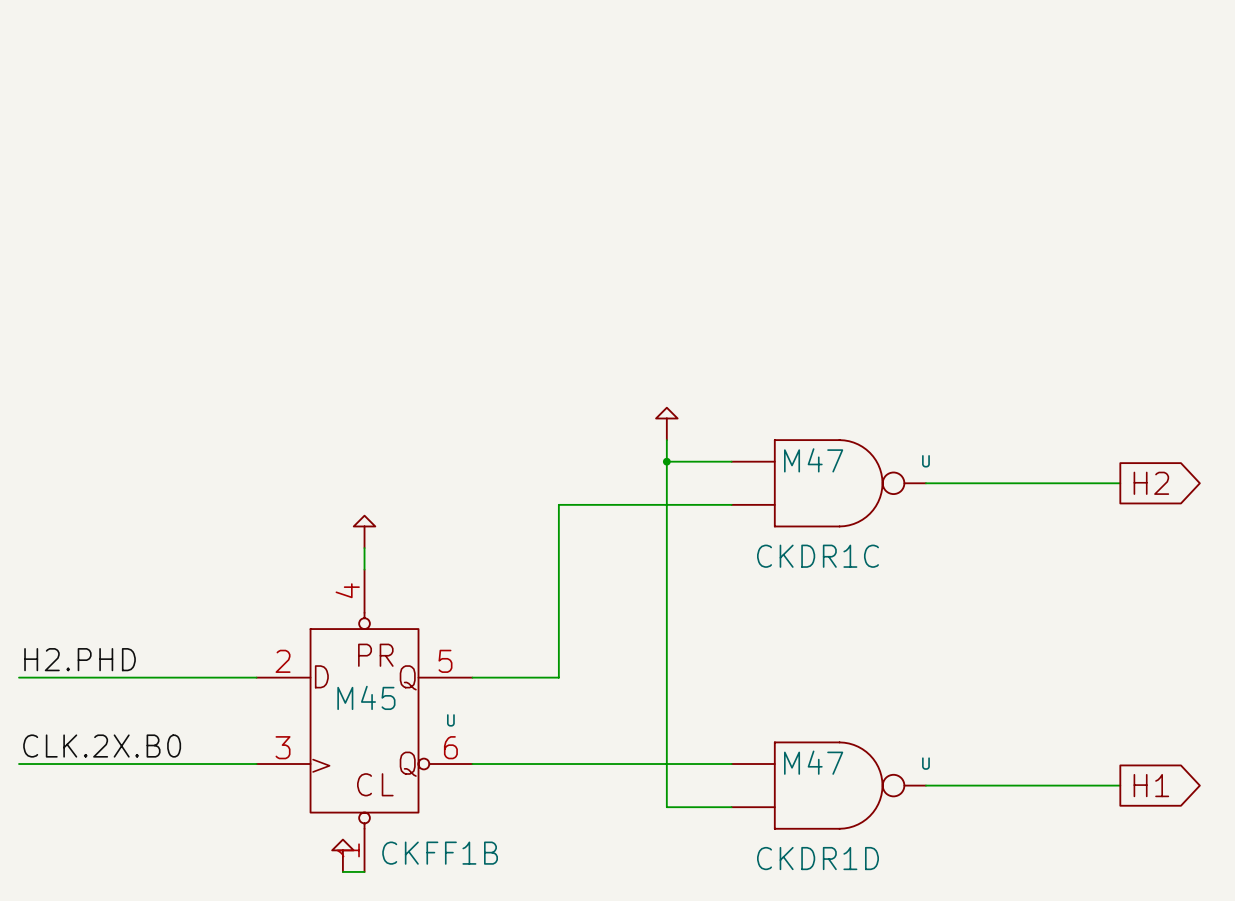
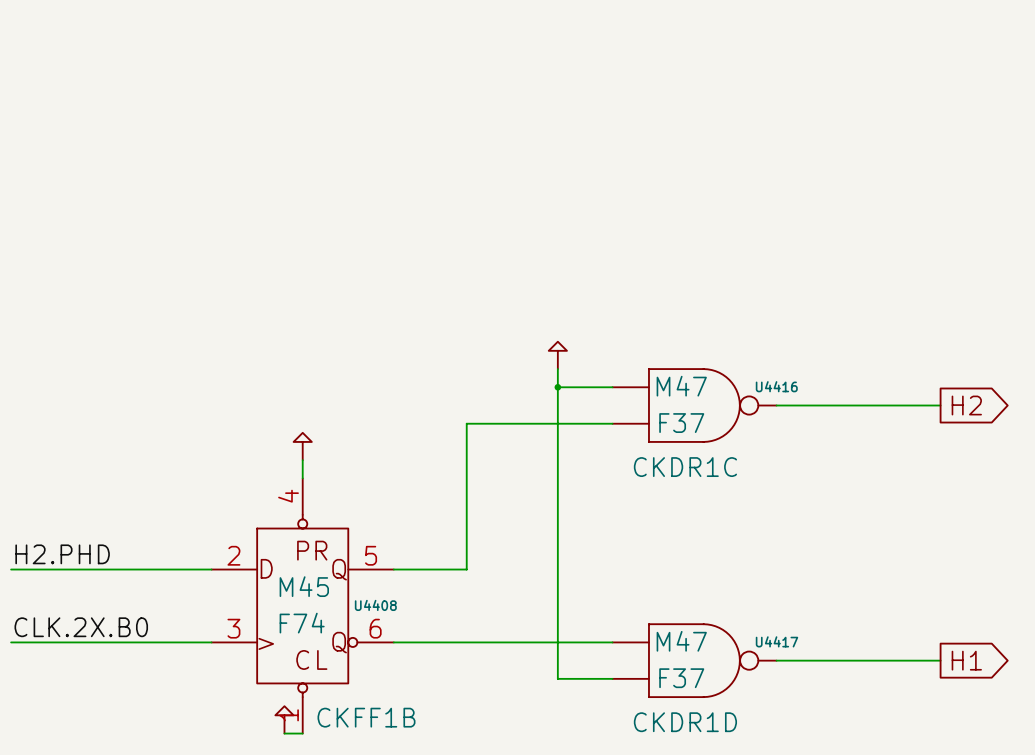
U name: U (925, 461) -> U4416 (776, 386)
U value: none -> F37 (681, 423)
U name: U (450, 720) -> U4408 (375, 605)
U value: none -> F74 (302, 623)
U name: U (925, 763) -> U4417 (776, 641)
U value: none -> F37 (681, 678)

